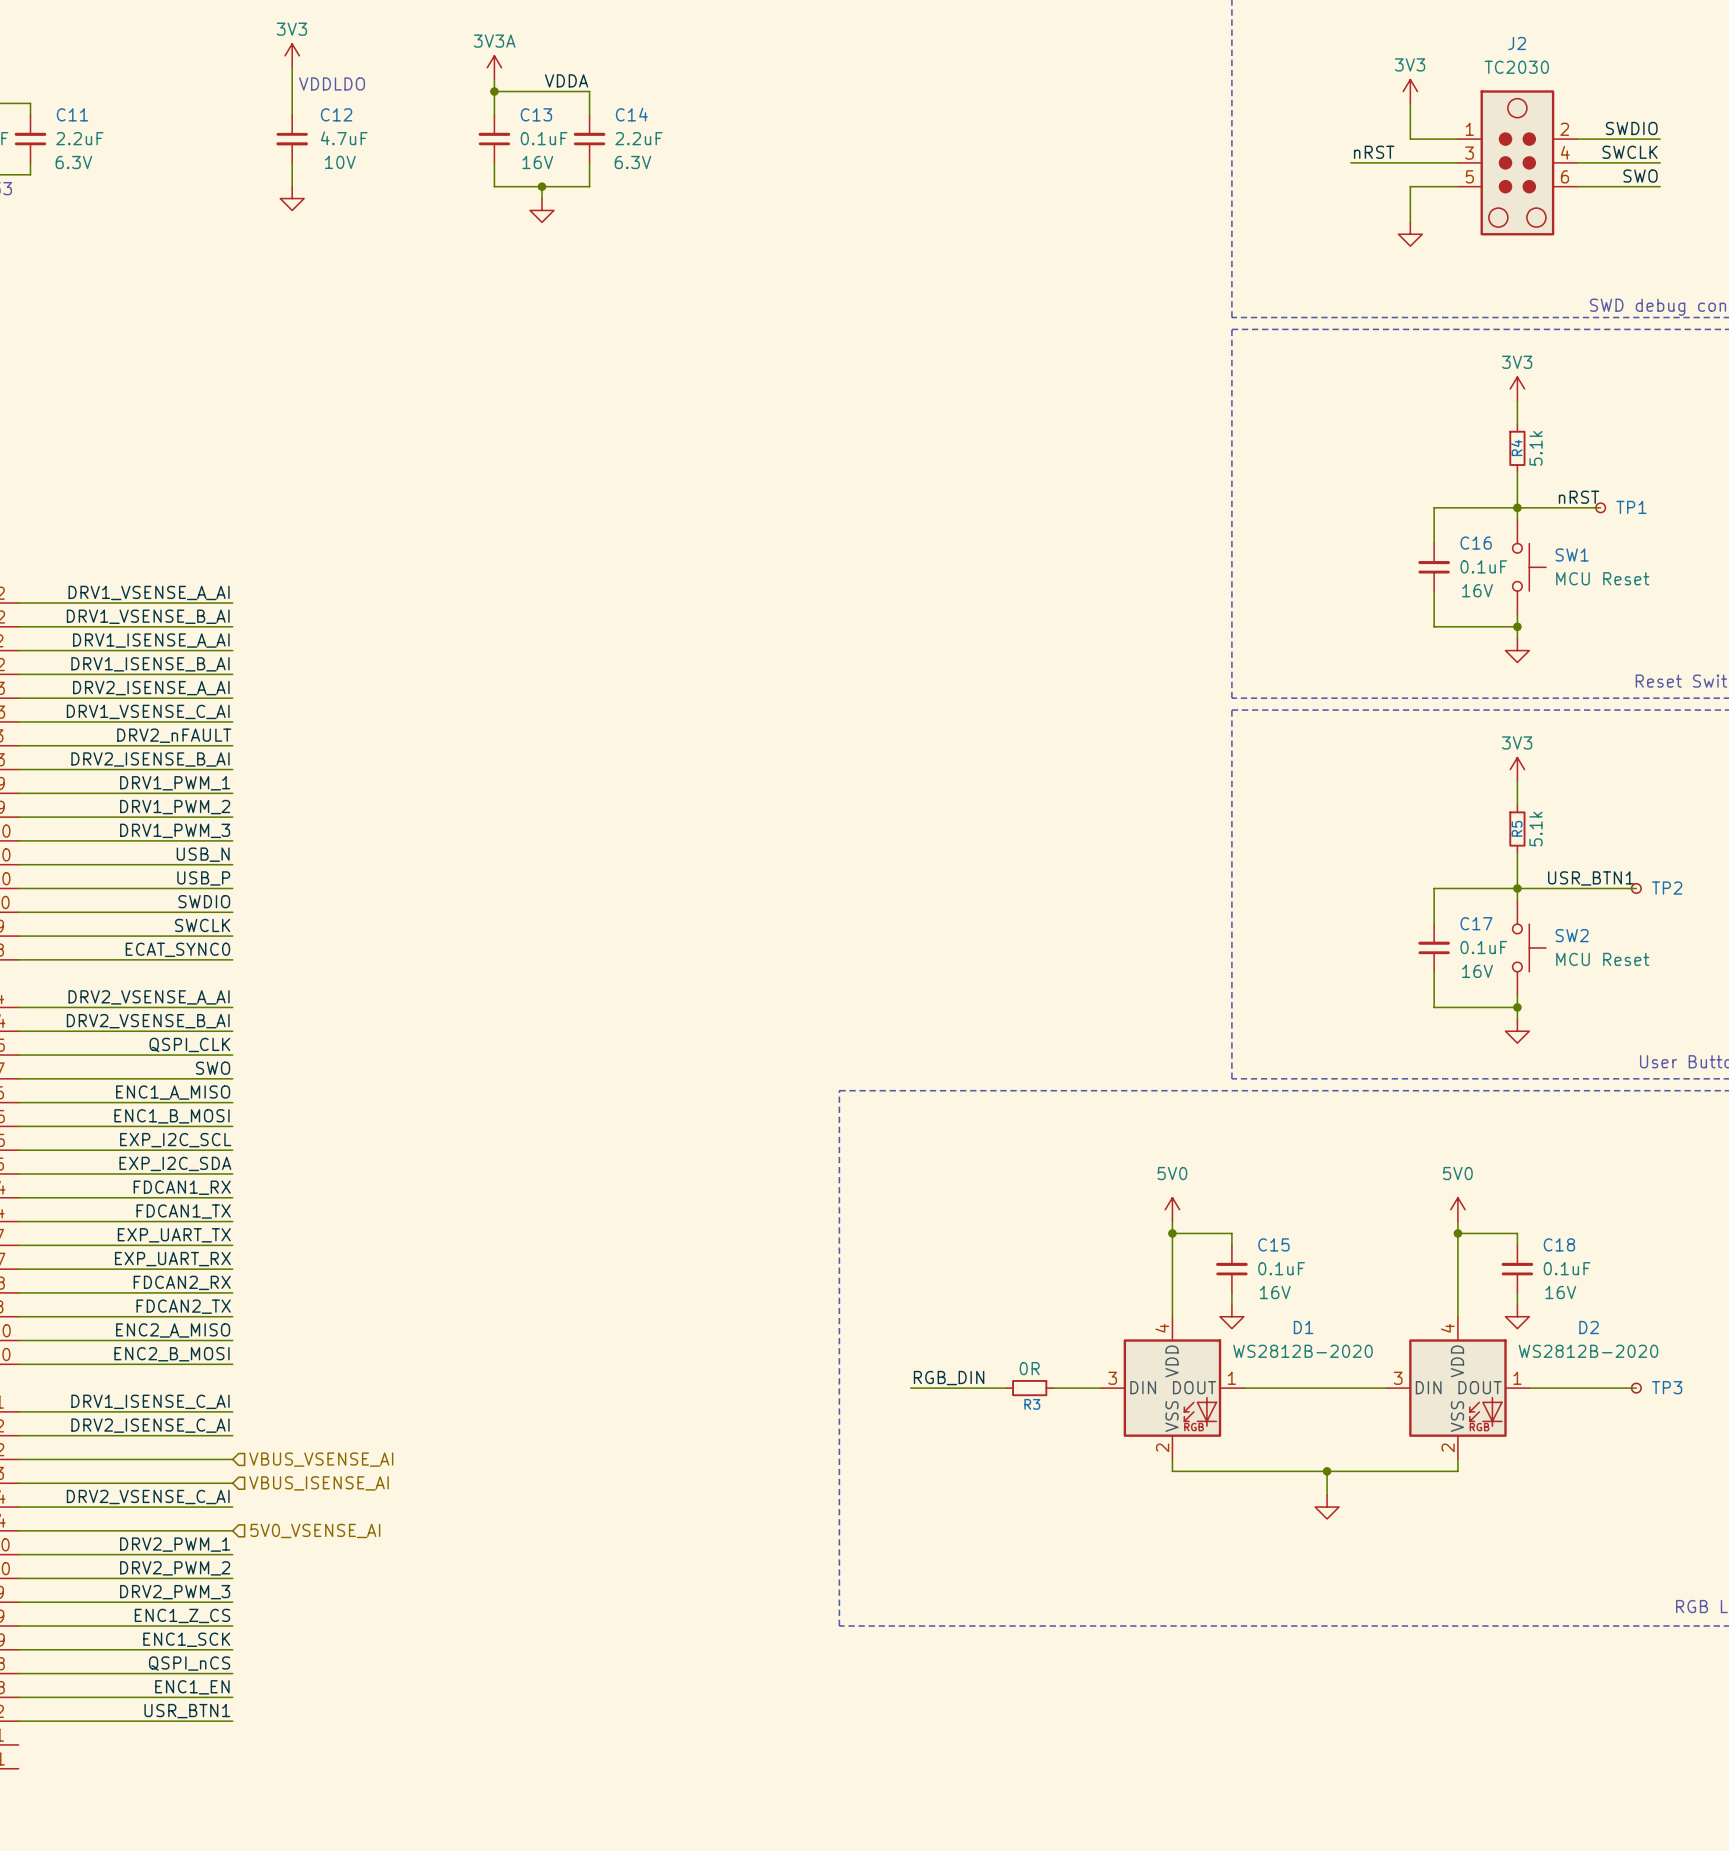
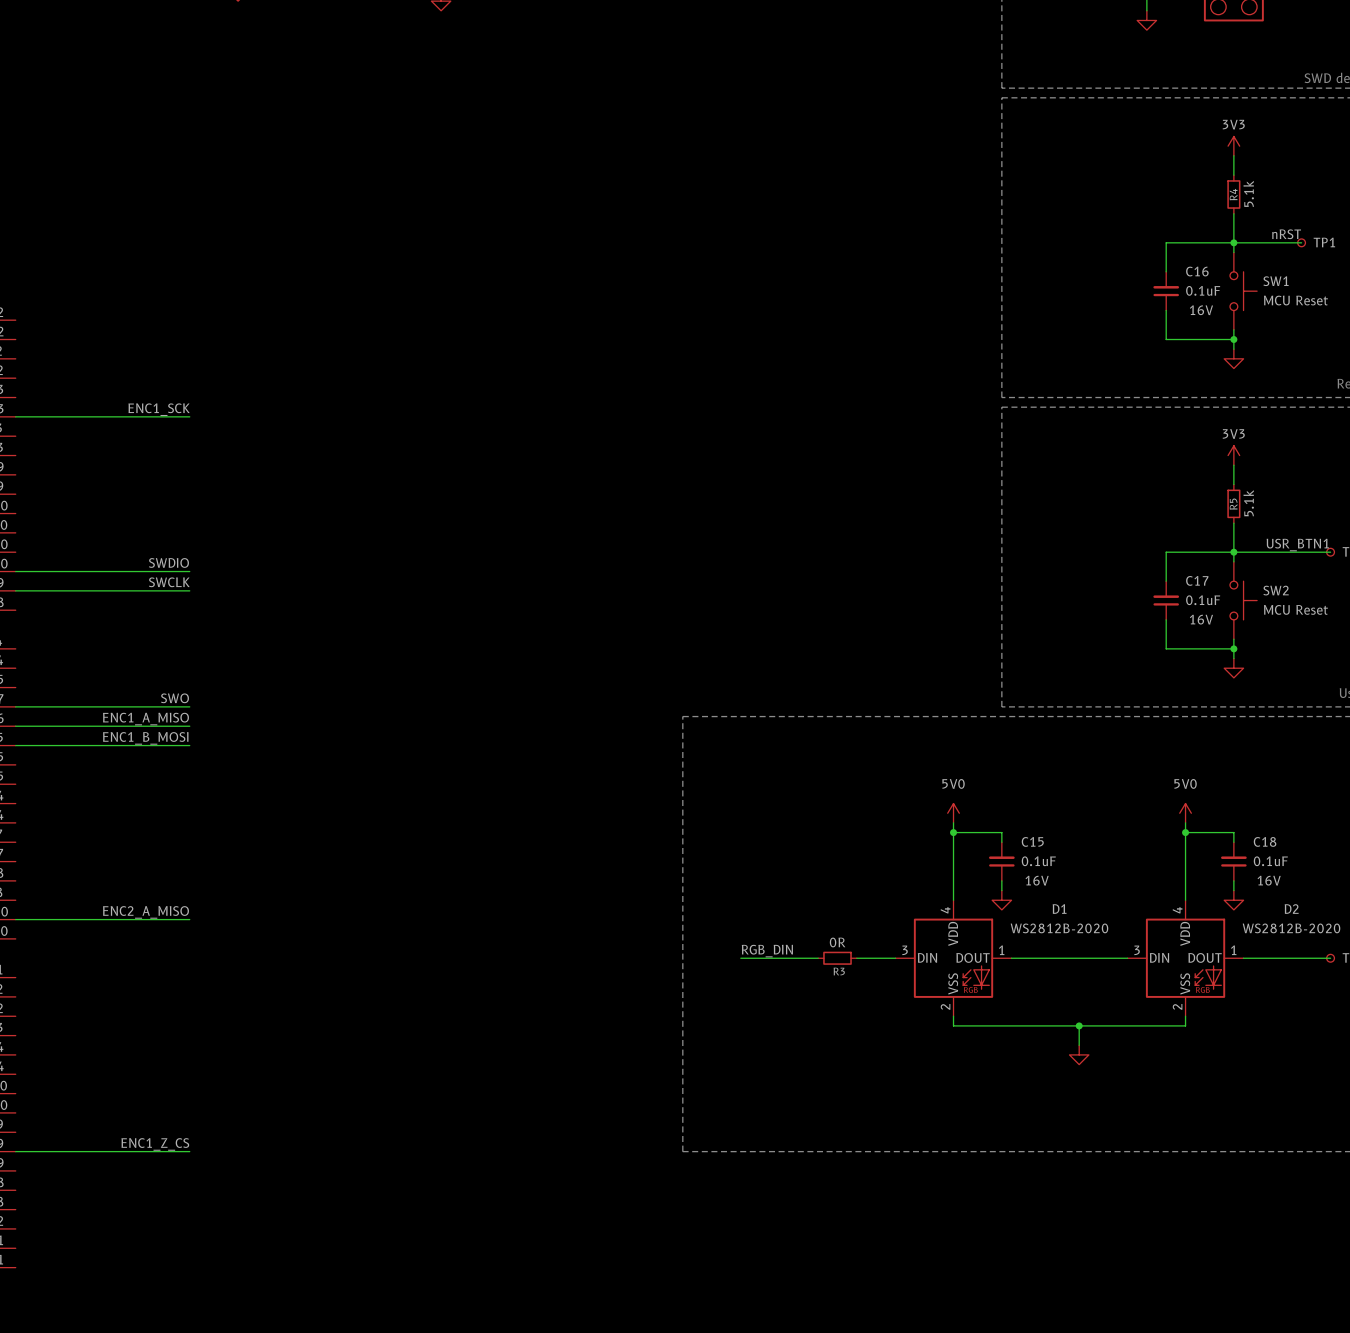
label: DRV1_VSENSE_A_AI (149, 592) -> none
wire: (18, 603) (232, 603) -> none
label: DRV1_VSENSE_B_AI (148, 616) -> none
wire: (18, 626) (232, 626) -> none
label: DRV1_ISENSE_A_AI (151, 640) -> none
wire: (18, 650) (232, 650) -> none
label: DRV1_ISENSE_B_AI (150, 664) -> none
wire: (18, 674) (232, 674) -> none
label: DRV2_ISENSE_A_AI (151, 688) -> none
wire: (18, 698) (232, 698) -> none
label: DRV1_VSENSE_C_AI (148, 711) -> ENC1_SCK (159, 409)
label: DRV2_nFAULT (174, 735) -> none
wire: (18, 745) (232, 745) -> none
label: DRV2_ISENSE_B_AI (150, 759) -> none
wire: (18, 769) (232, 769) -> none
label: DRV1_PWM_1 (175, 783) -> none
wire: (18, 793) (232, 793) -> none
label: DRV1_PWM_2 (175, 807) -> none
wire: (18, 817) (232, 817) -> none
label: DRV1_PWM_3 (175, 830) -> none
wire: (18, 840) (232, 840) -> none
label: USB_N (203, 854) -> none
wire: (18, 864) (232, 864) -> none
label: USB_P (203, 878) -> none
wire: (18, 888) (232, 888) -> none
label: ECAT_SYNC0 (177, 949) -> none
wire: (18, 959) (232, 959) -> none
label: DRV2_VSENSE_A_AI (149, 997) -> none
wire: (18, 1007) (232, 1007) -> none
label: DRV2_VSENSE_B_AI (148, 1021) -> none
wire: (18, 1031) (232, 1031) -> none
label: QSPI_CLK (189, 1044) -> none
wire: (18, 1055) (232, 1055) -> none
label: EXP_I2C_SCL (175, 1140) -> none
wire: (18, 1150) (232, 1150) -> none
label: EXP_I2C_SDA (175, 1163) -> none
wire: (18, 1173) (232, 1173) -> none
label: FDCAN1_RX (182, 1187) -> none
wire: (18, 1197) (232, 1197) -> none
label: FDCAN1_TX (183, 1211) -> none
wire: (18, 1221) (232, 1221) -> none
label: EXP_UART_TX (174, 1235) -> none
wire: (18, 1245) (232, 1245) -> none
label: EXP_UART_RX (172, 1259) -> none
wire: (18, 1269) (232, 1269) -> none
label: FDCAN2_RX (182, 1282) -> none
wire: (18, 1292) (232, 1292) -> none
label: FDCAN2_TX (183, 1306) -> none
wire: (18, 1316) (232, 1316) -> none
label: ENC2_B_MOSI (172, 1354) -> none
wire: (18, 1364) (232, 1364) -> none
label: DRV1_ISENSE_C_AI (150, 1401) -> none
wire: (18, 1411) (232, 1411) -> none
label: DRV2_ISENSE_C_AI (150, 1425) -> none
wire: (18, 1435) (232, 1435) -> none
wire: (18, 1459) (232, 1459) -> none
hierarchical label: VBUS_VSENSE_AI (321, 1459) -> none
wire: (18, 1483) (232, 1483) -> none
hierarchical label: VBUS_ISENSE_AI (319, 1483) -> none
label: DRV2_VSENSE_C_AI (148, 1497) -> none
wire: (18, 1507) (232, 1507) -> none
wire: (18, 1530) (232, 1530) -> none
hierarchical label: 5V0_VSENSE_AI (315, 1530) -> none
label: DRV2_PWM_1 (175, 1544) -> none
wire: (18, 1554) (232, 1554) -> none
label: DRV2_PWM_2 (175, 1568) -> none
wire: (18, 1578) (232, 1578) -> none
label: DRV2_PWM_3 (175, 1592) -> none
wire: (18, 1602) (232, 1602) -> none
label: ENC1_SCK (186, 1639) -> none
wire: (18, 1649) (232, 1649) -> none
label: QSPI_nCS (189, 1663) -> none
wire: (18, 1673) (232, 1673) -> none
label: ENC1_EN (192, 1687) -> none
wire: (18, 1697) (232, 1697) -> none
label: USR_BTN1 (187, 1711) -> none
wire: (18, 1721) (232, 1721) -> none

